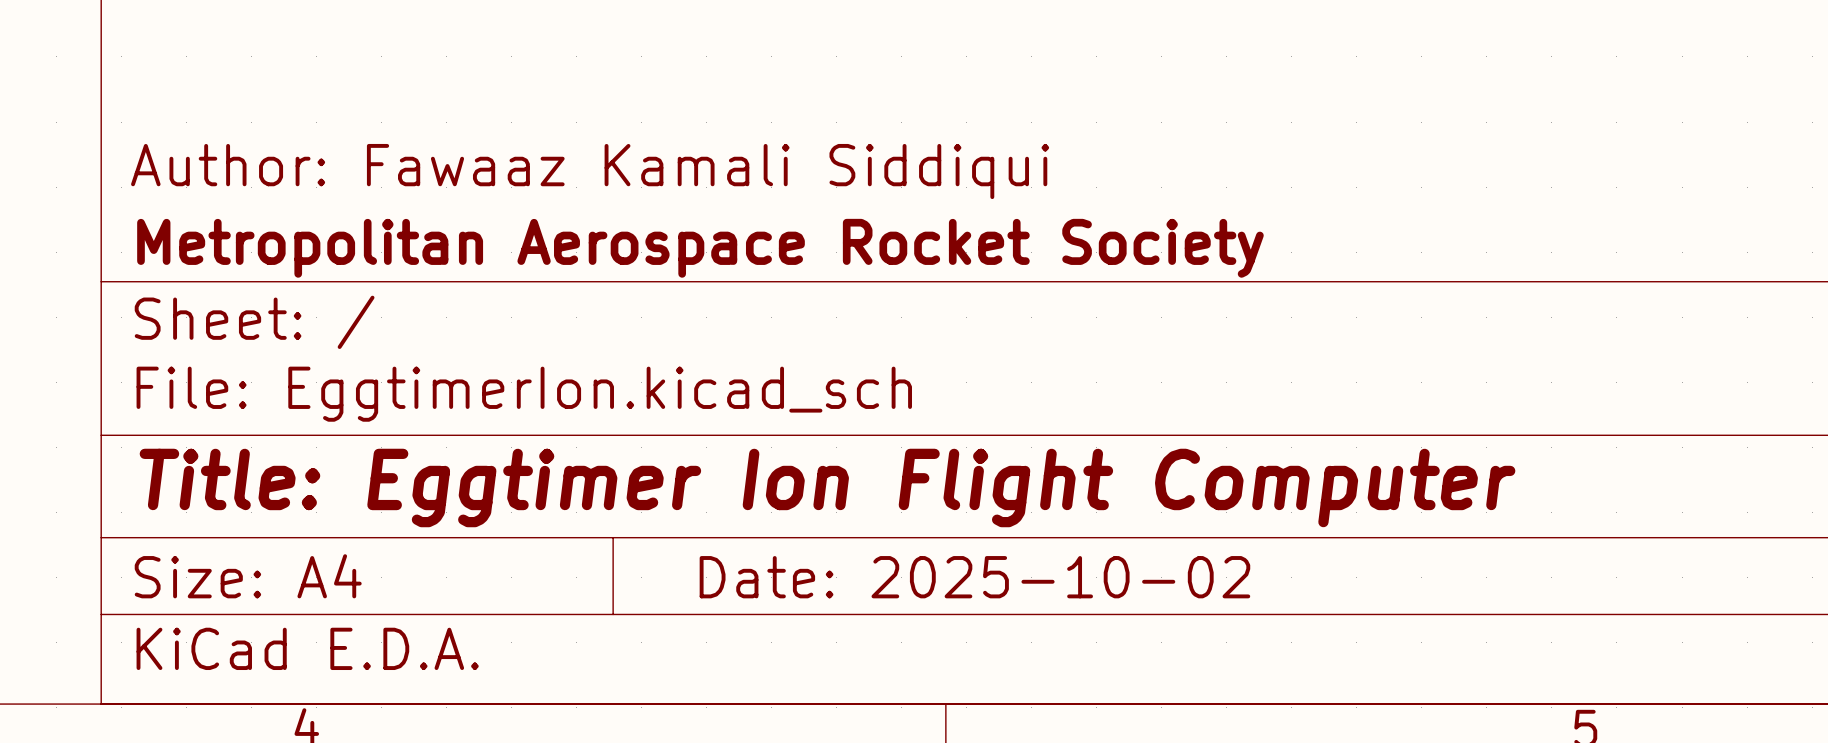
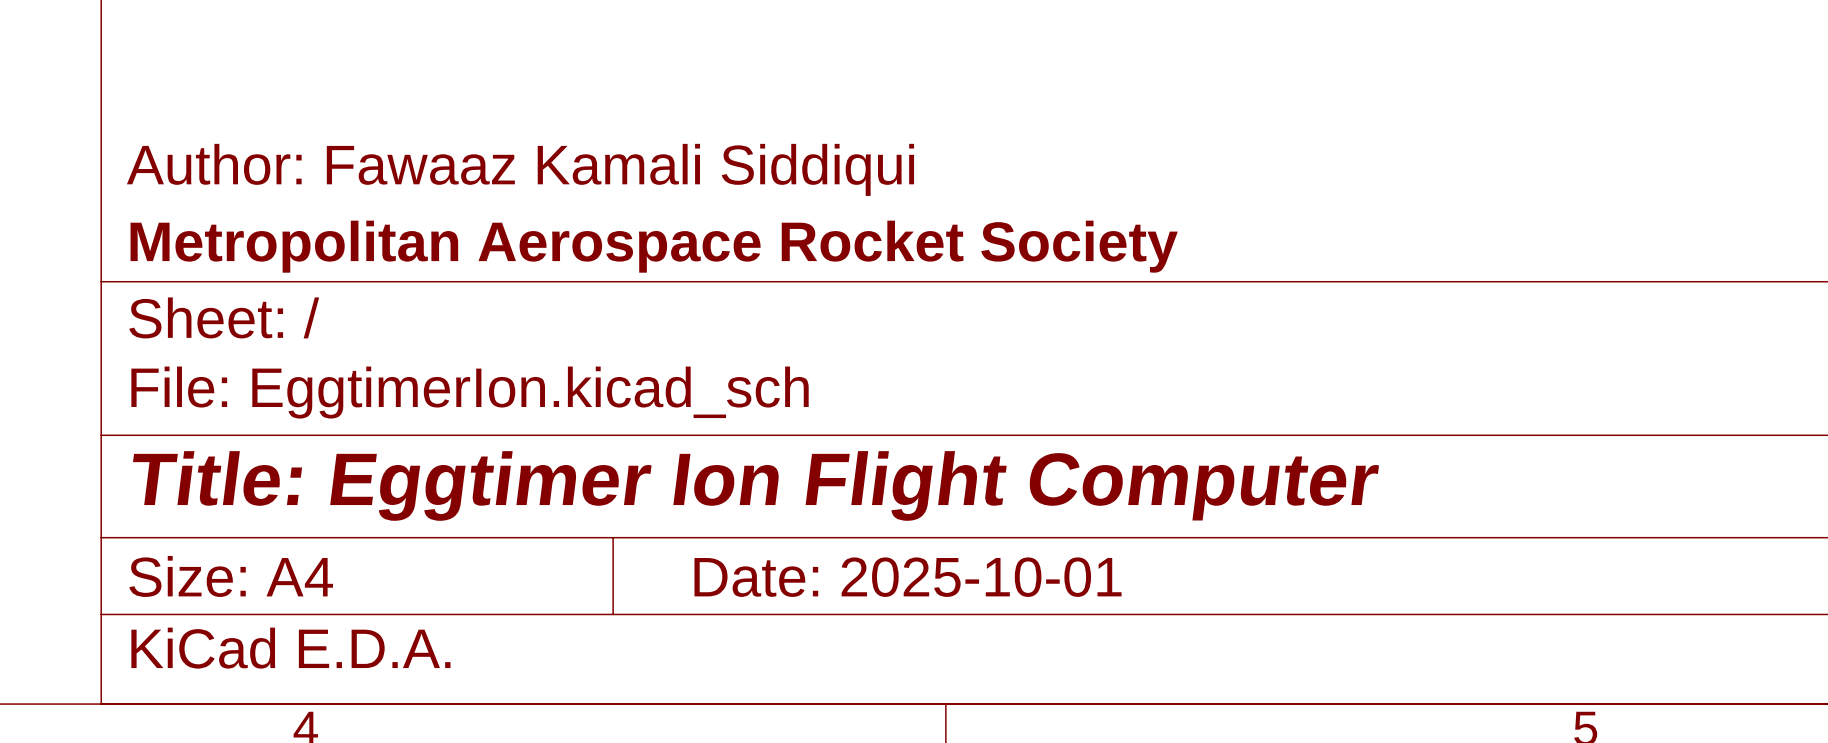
title block: Date: 2025-10-02 (974, 577) -> Date: 2025-10-01 (908, 577)

